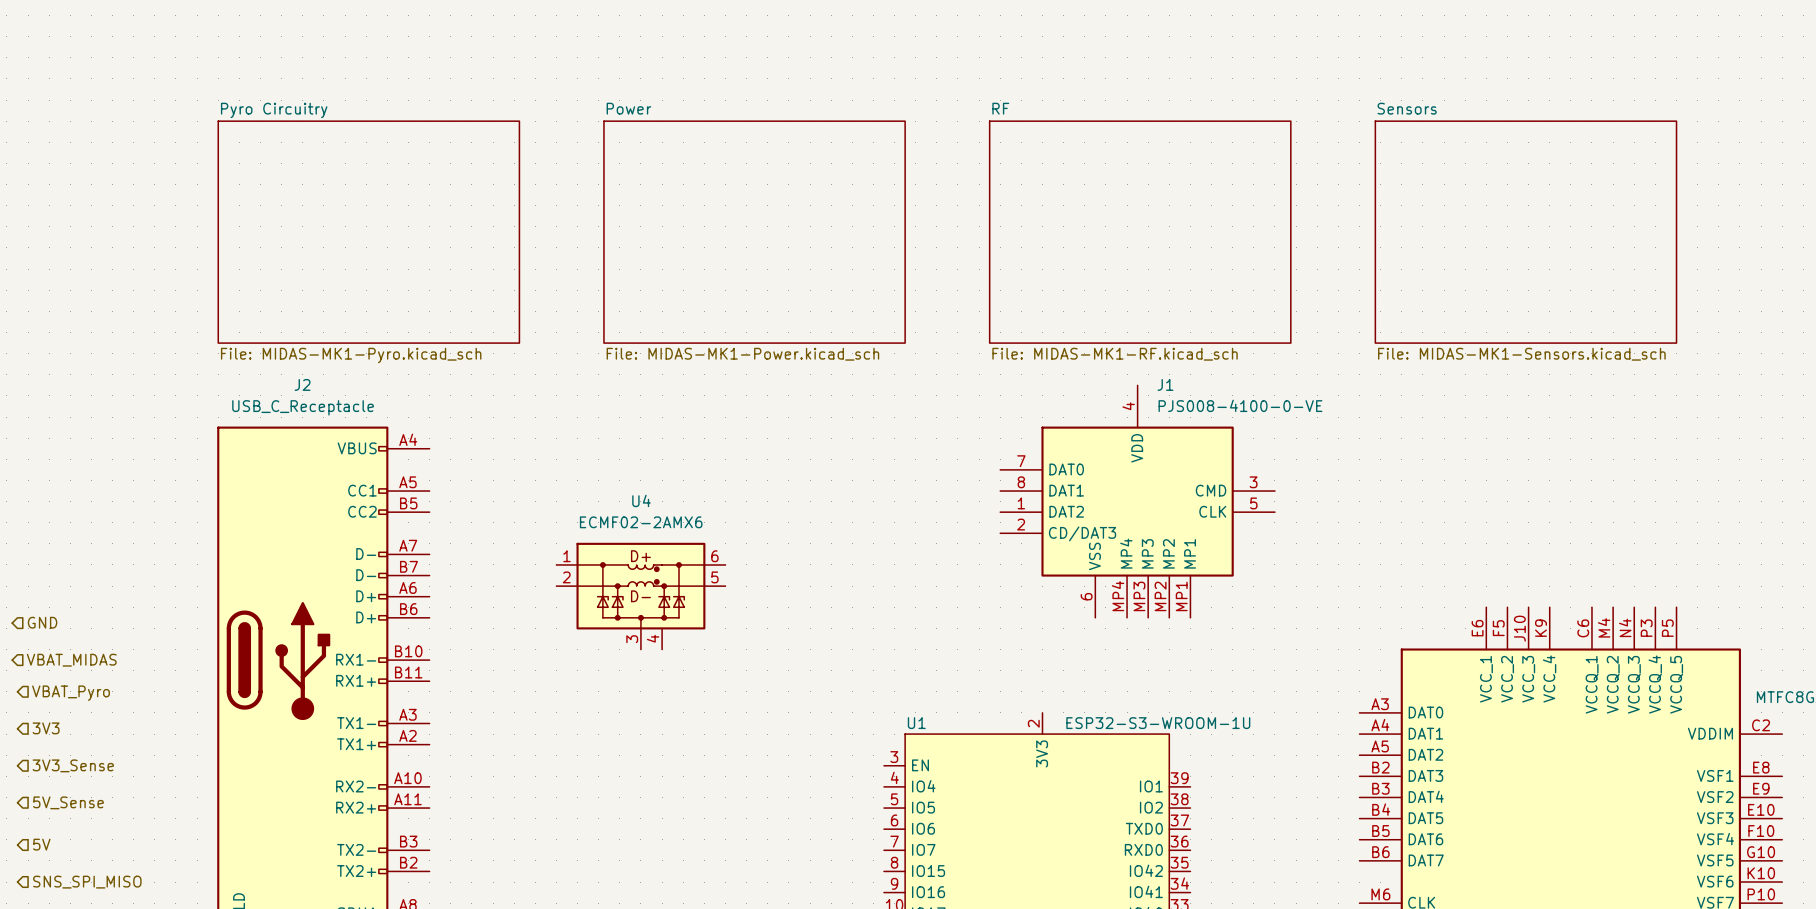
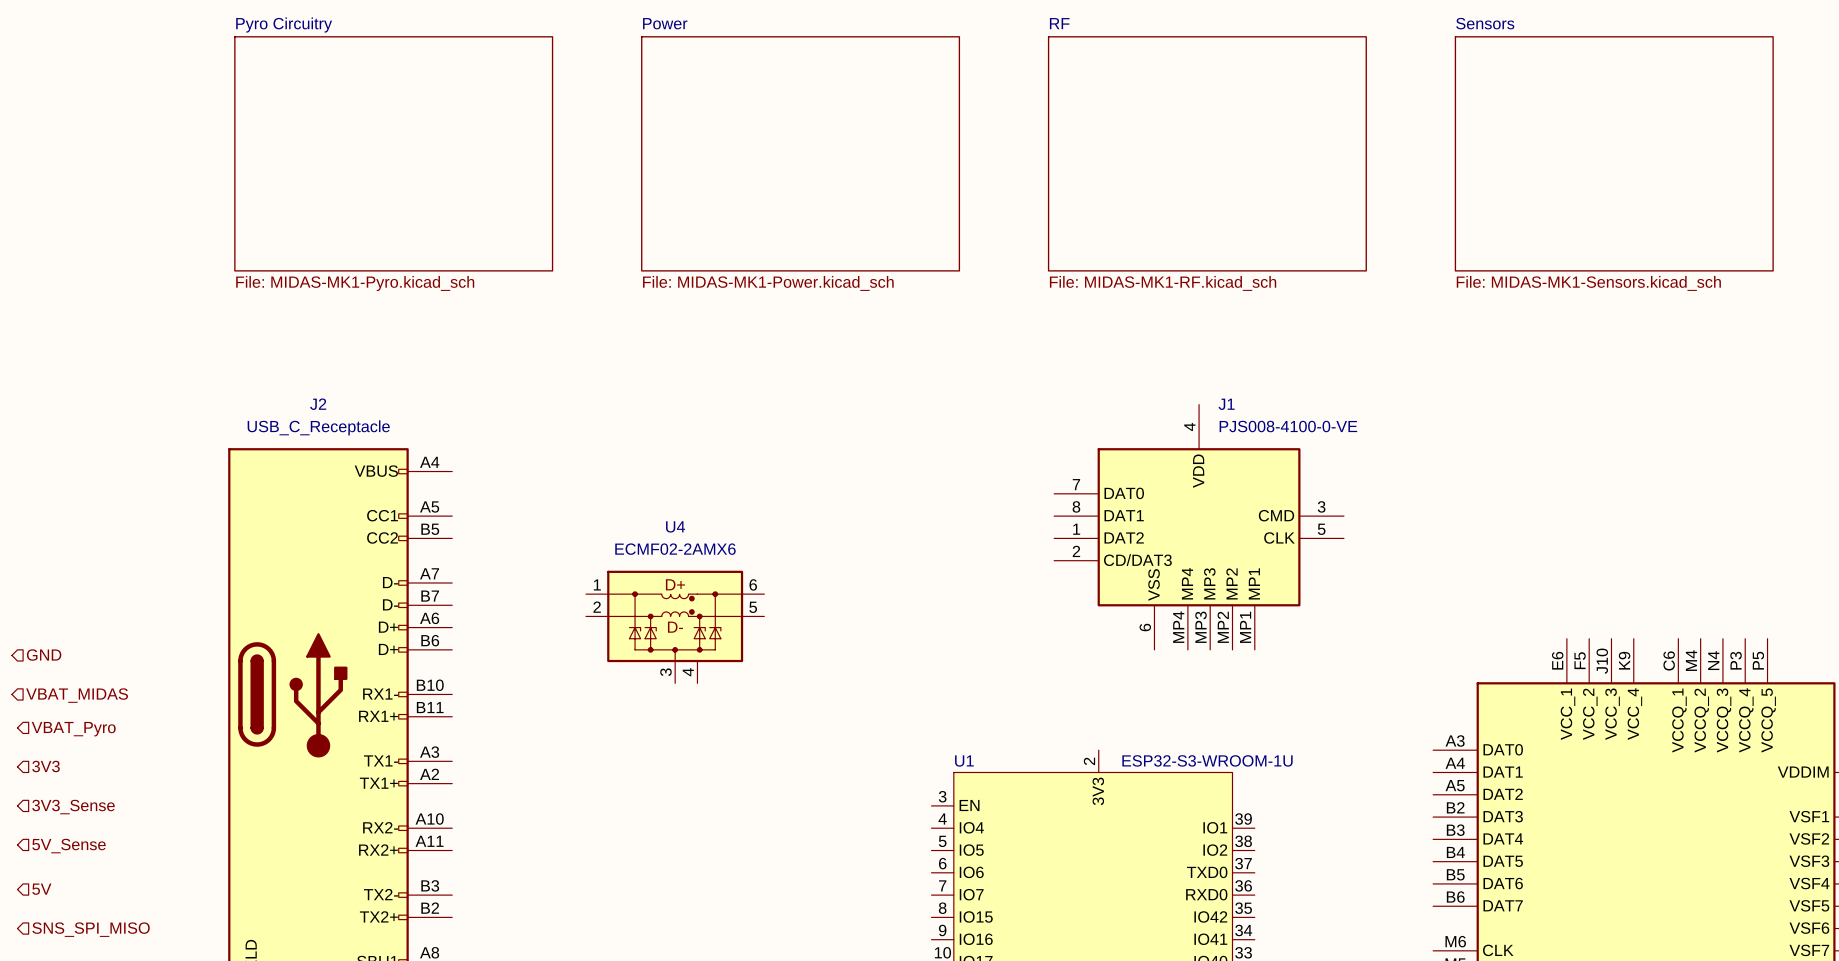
sheet Pyro Circuitry position: (368, 232) -> (393, 153)
sheet Power position: (754, 232) -> (800, 153)
sheet RF position: (1140, 232) -> (1207, 153)
sheet Sensors position: (1525, 232) -> (1614, 153)

